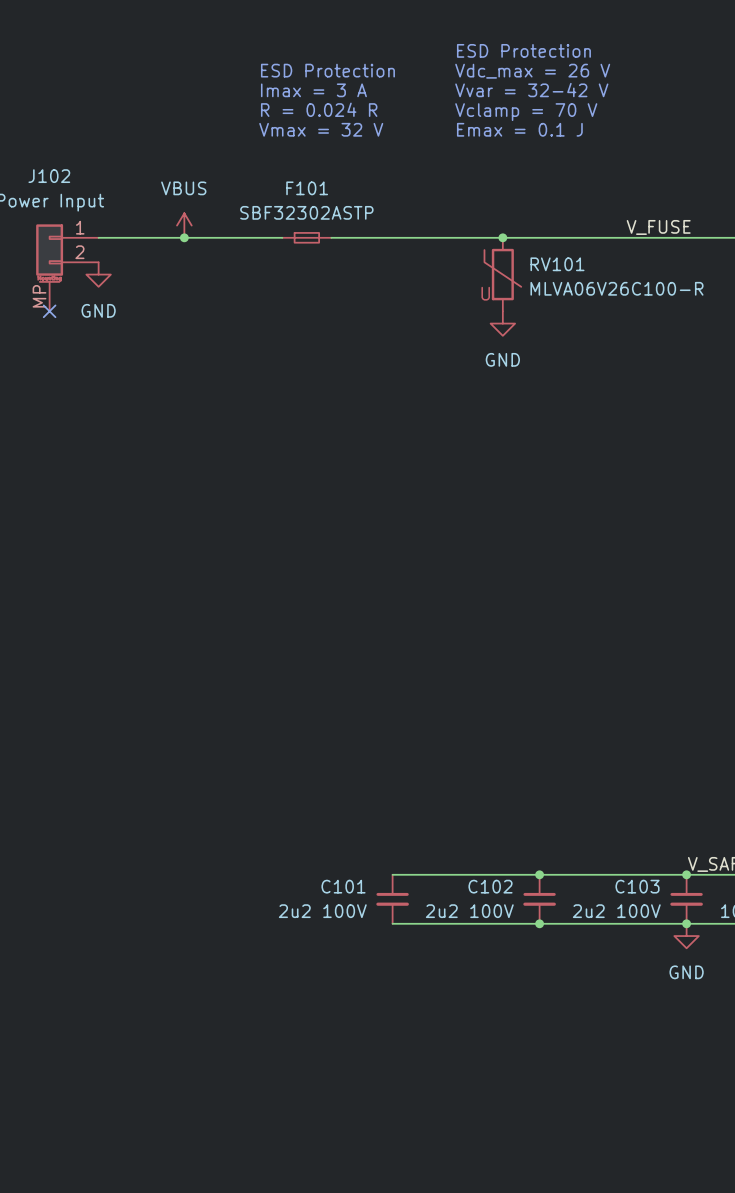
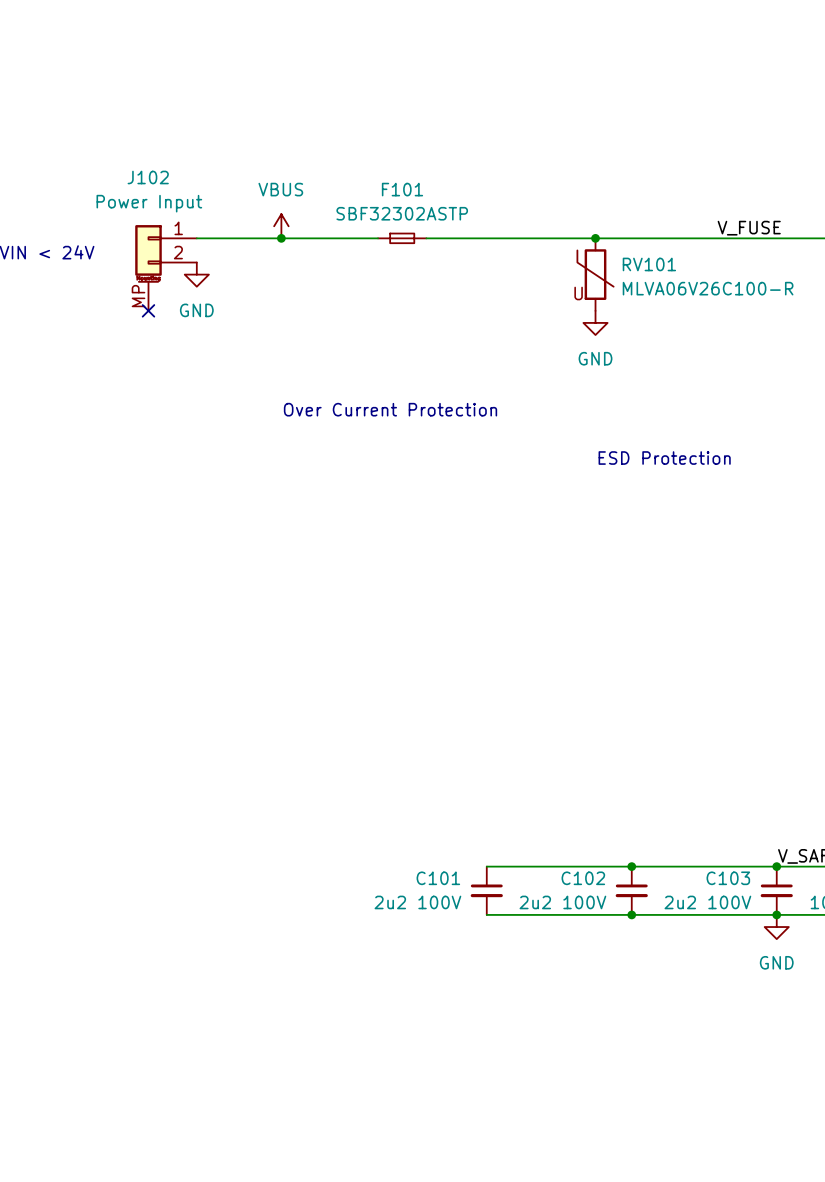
text: ESD Protection (523, 50) -> none
text: ESD Protection (327, 70) -> none
text: Vdc_max = 26 V (532, 71) -> none
text: Imax = 3 A (313, 90) -> none
text: Vvar = 32-42 V (531, 90) -> none
text: R = 0.024 R (319, 109) -> none
text: Vclamp = 70 V (526, 112) -> none
text: Vmax = 32 V (321, 129) -> none
text: Emax = 0.1 J (519, 129) -> none
text: none -> Over Current Protection (390, 409)
text: none -> ESD Protection (664, 458)

